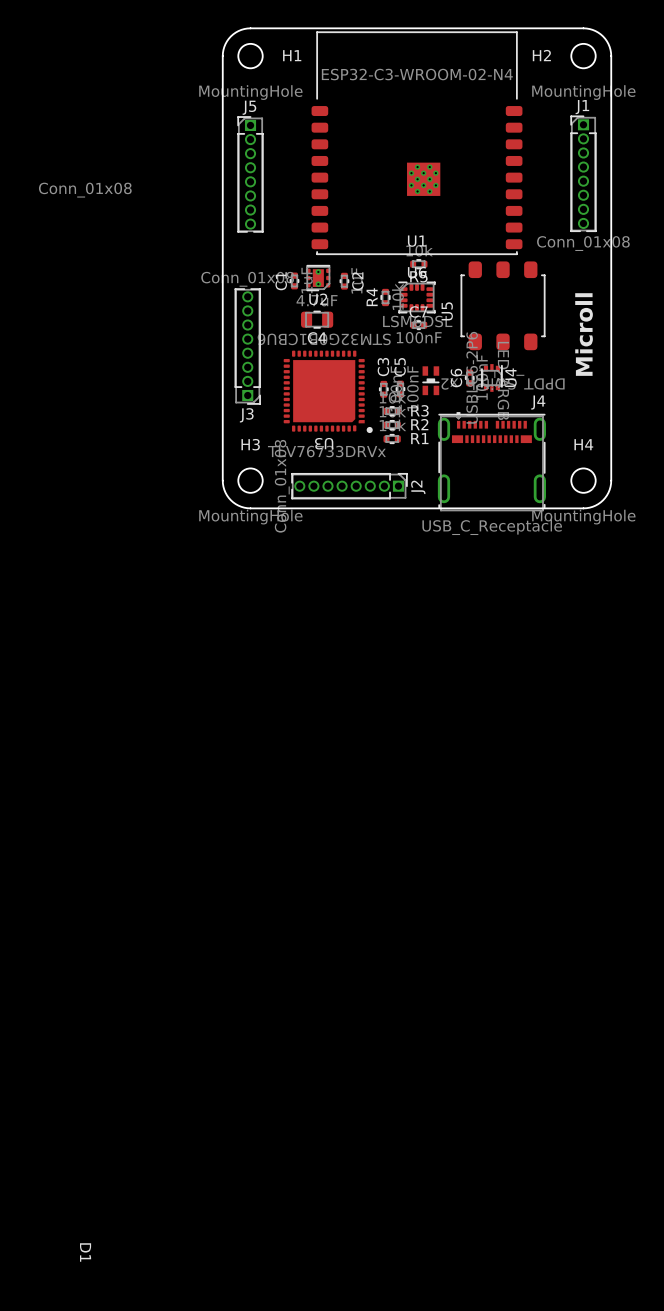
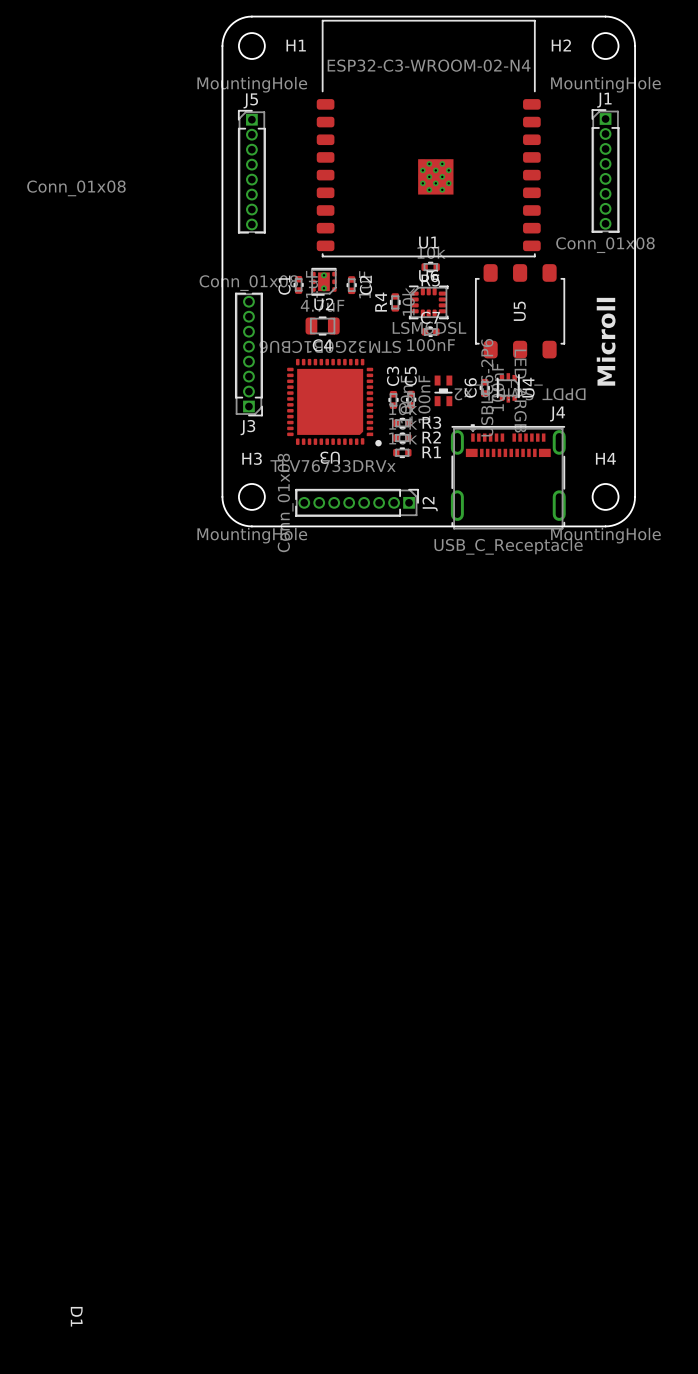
U5 name position: U5 (447, 311) -> U5 (519, 311)

